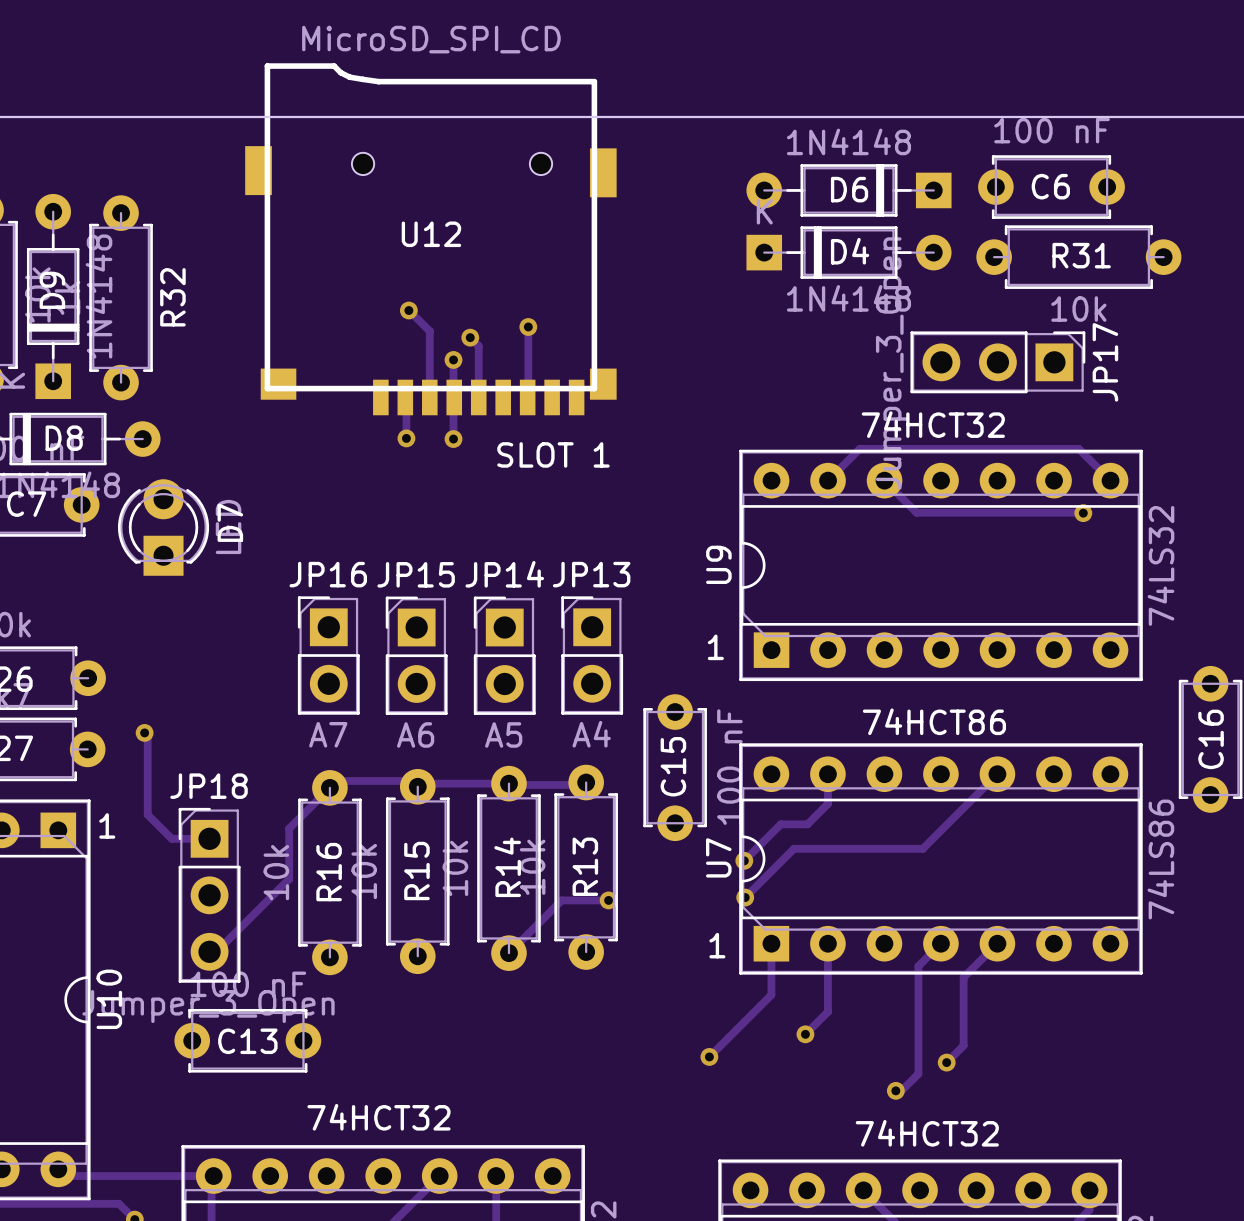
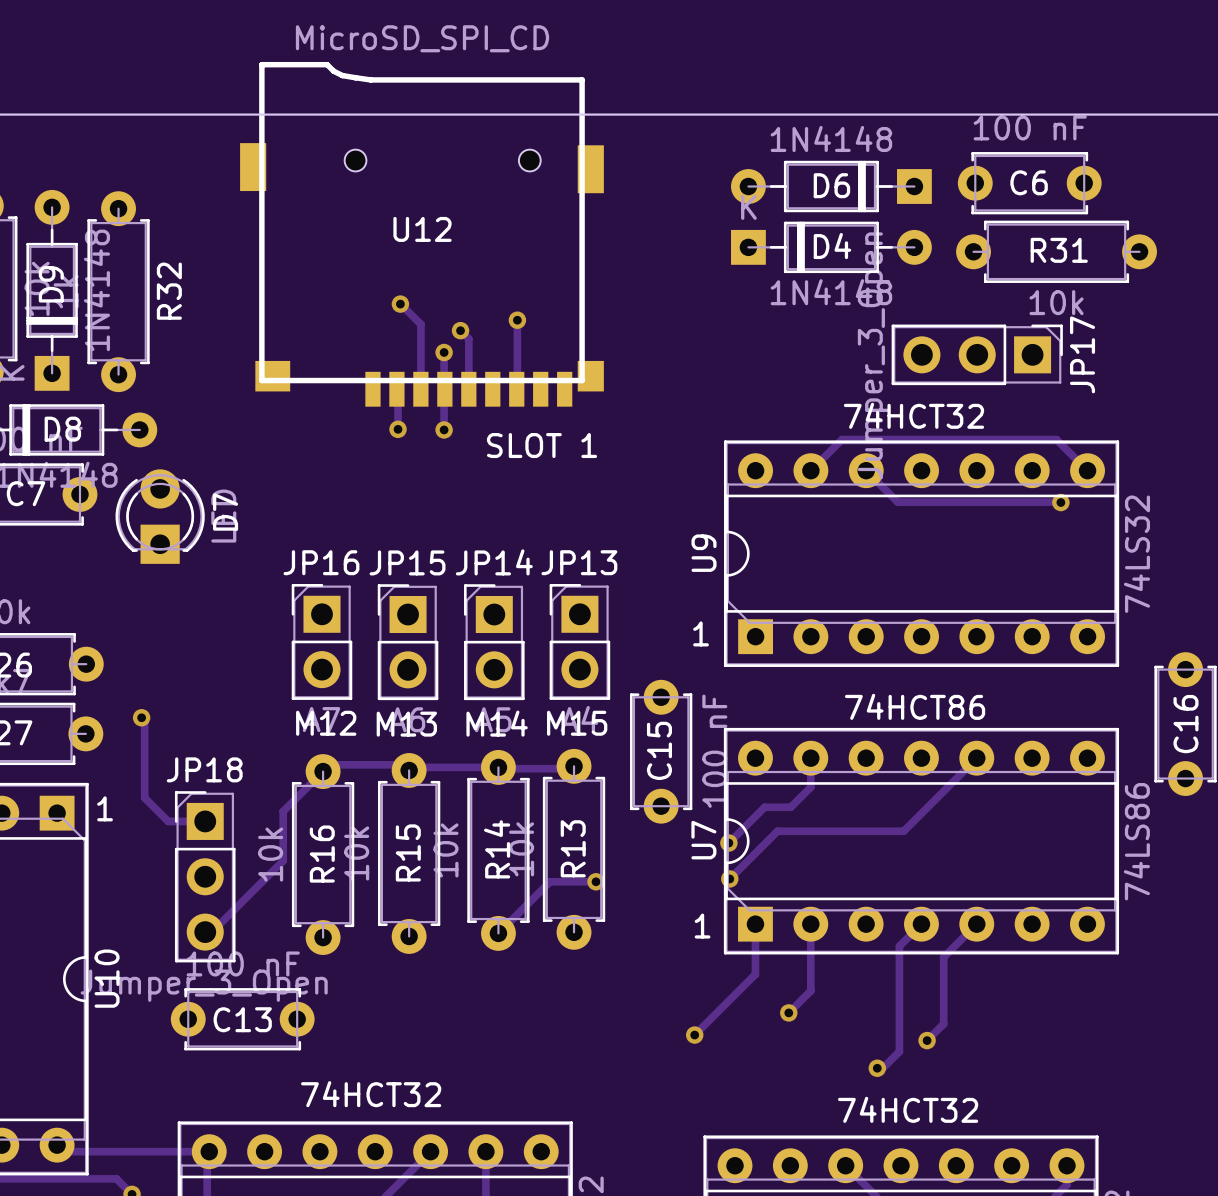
text: none -> M12 (326, 723)
text: none -> M14 (497, 723)
text: none -> M15 (577, 723)
text: none -> M13 (406, 724)

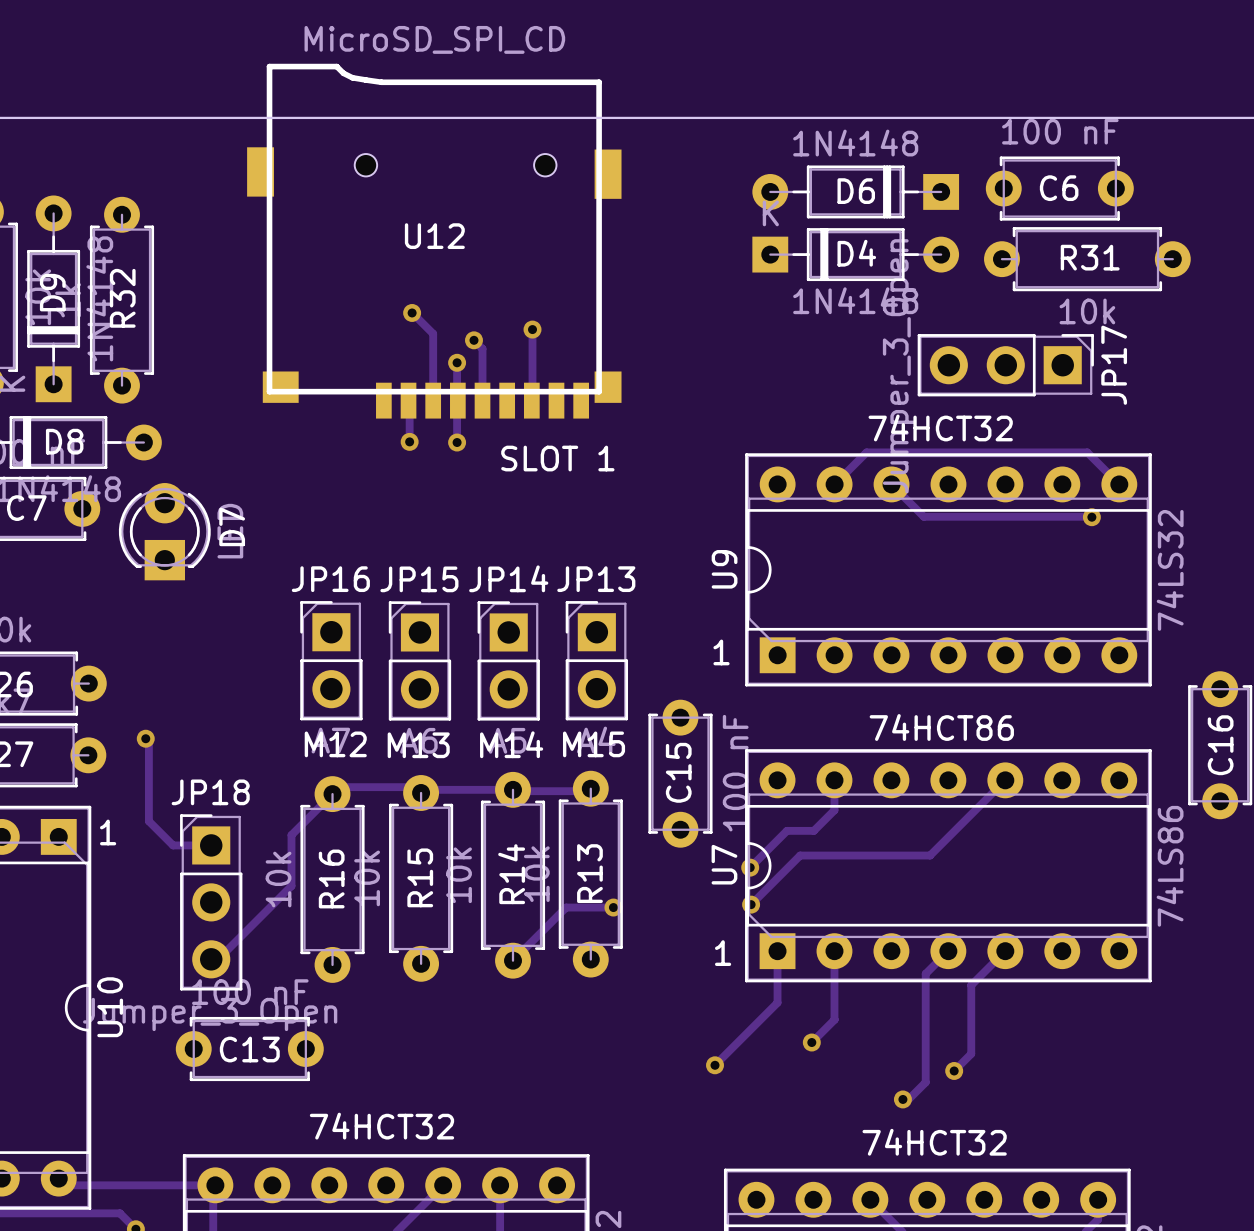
R32 name position: R32 (169, 291) -> R32 (122, 298)

